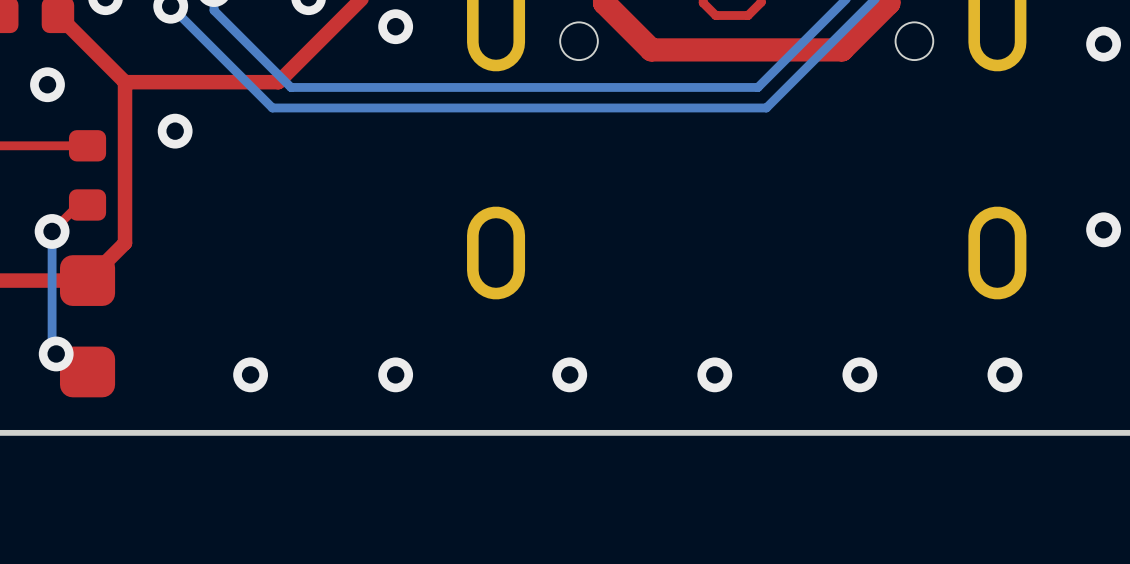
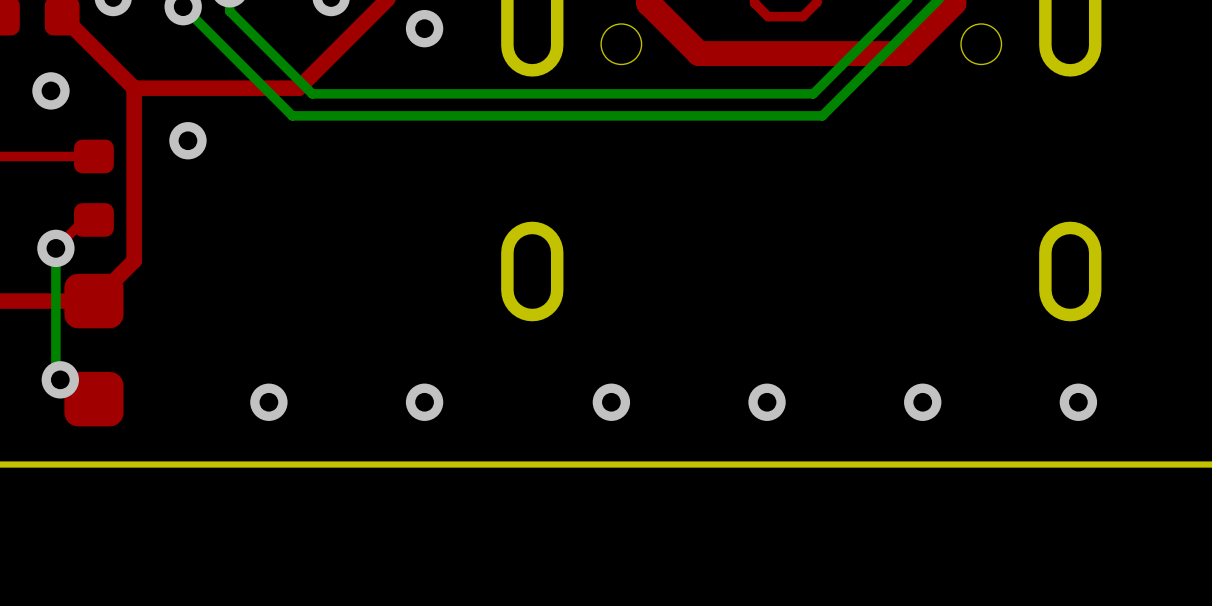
via: (1103, 44) -> none
via: (1103, 229) -> none

